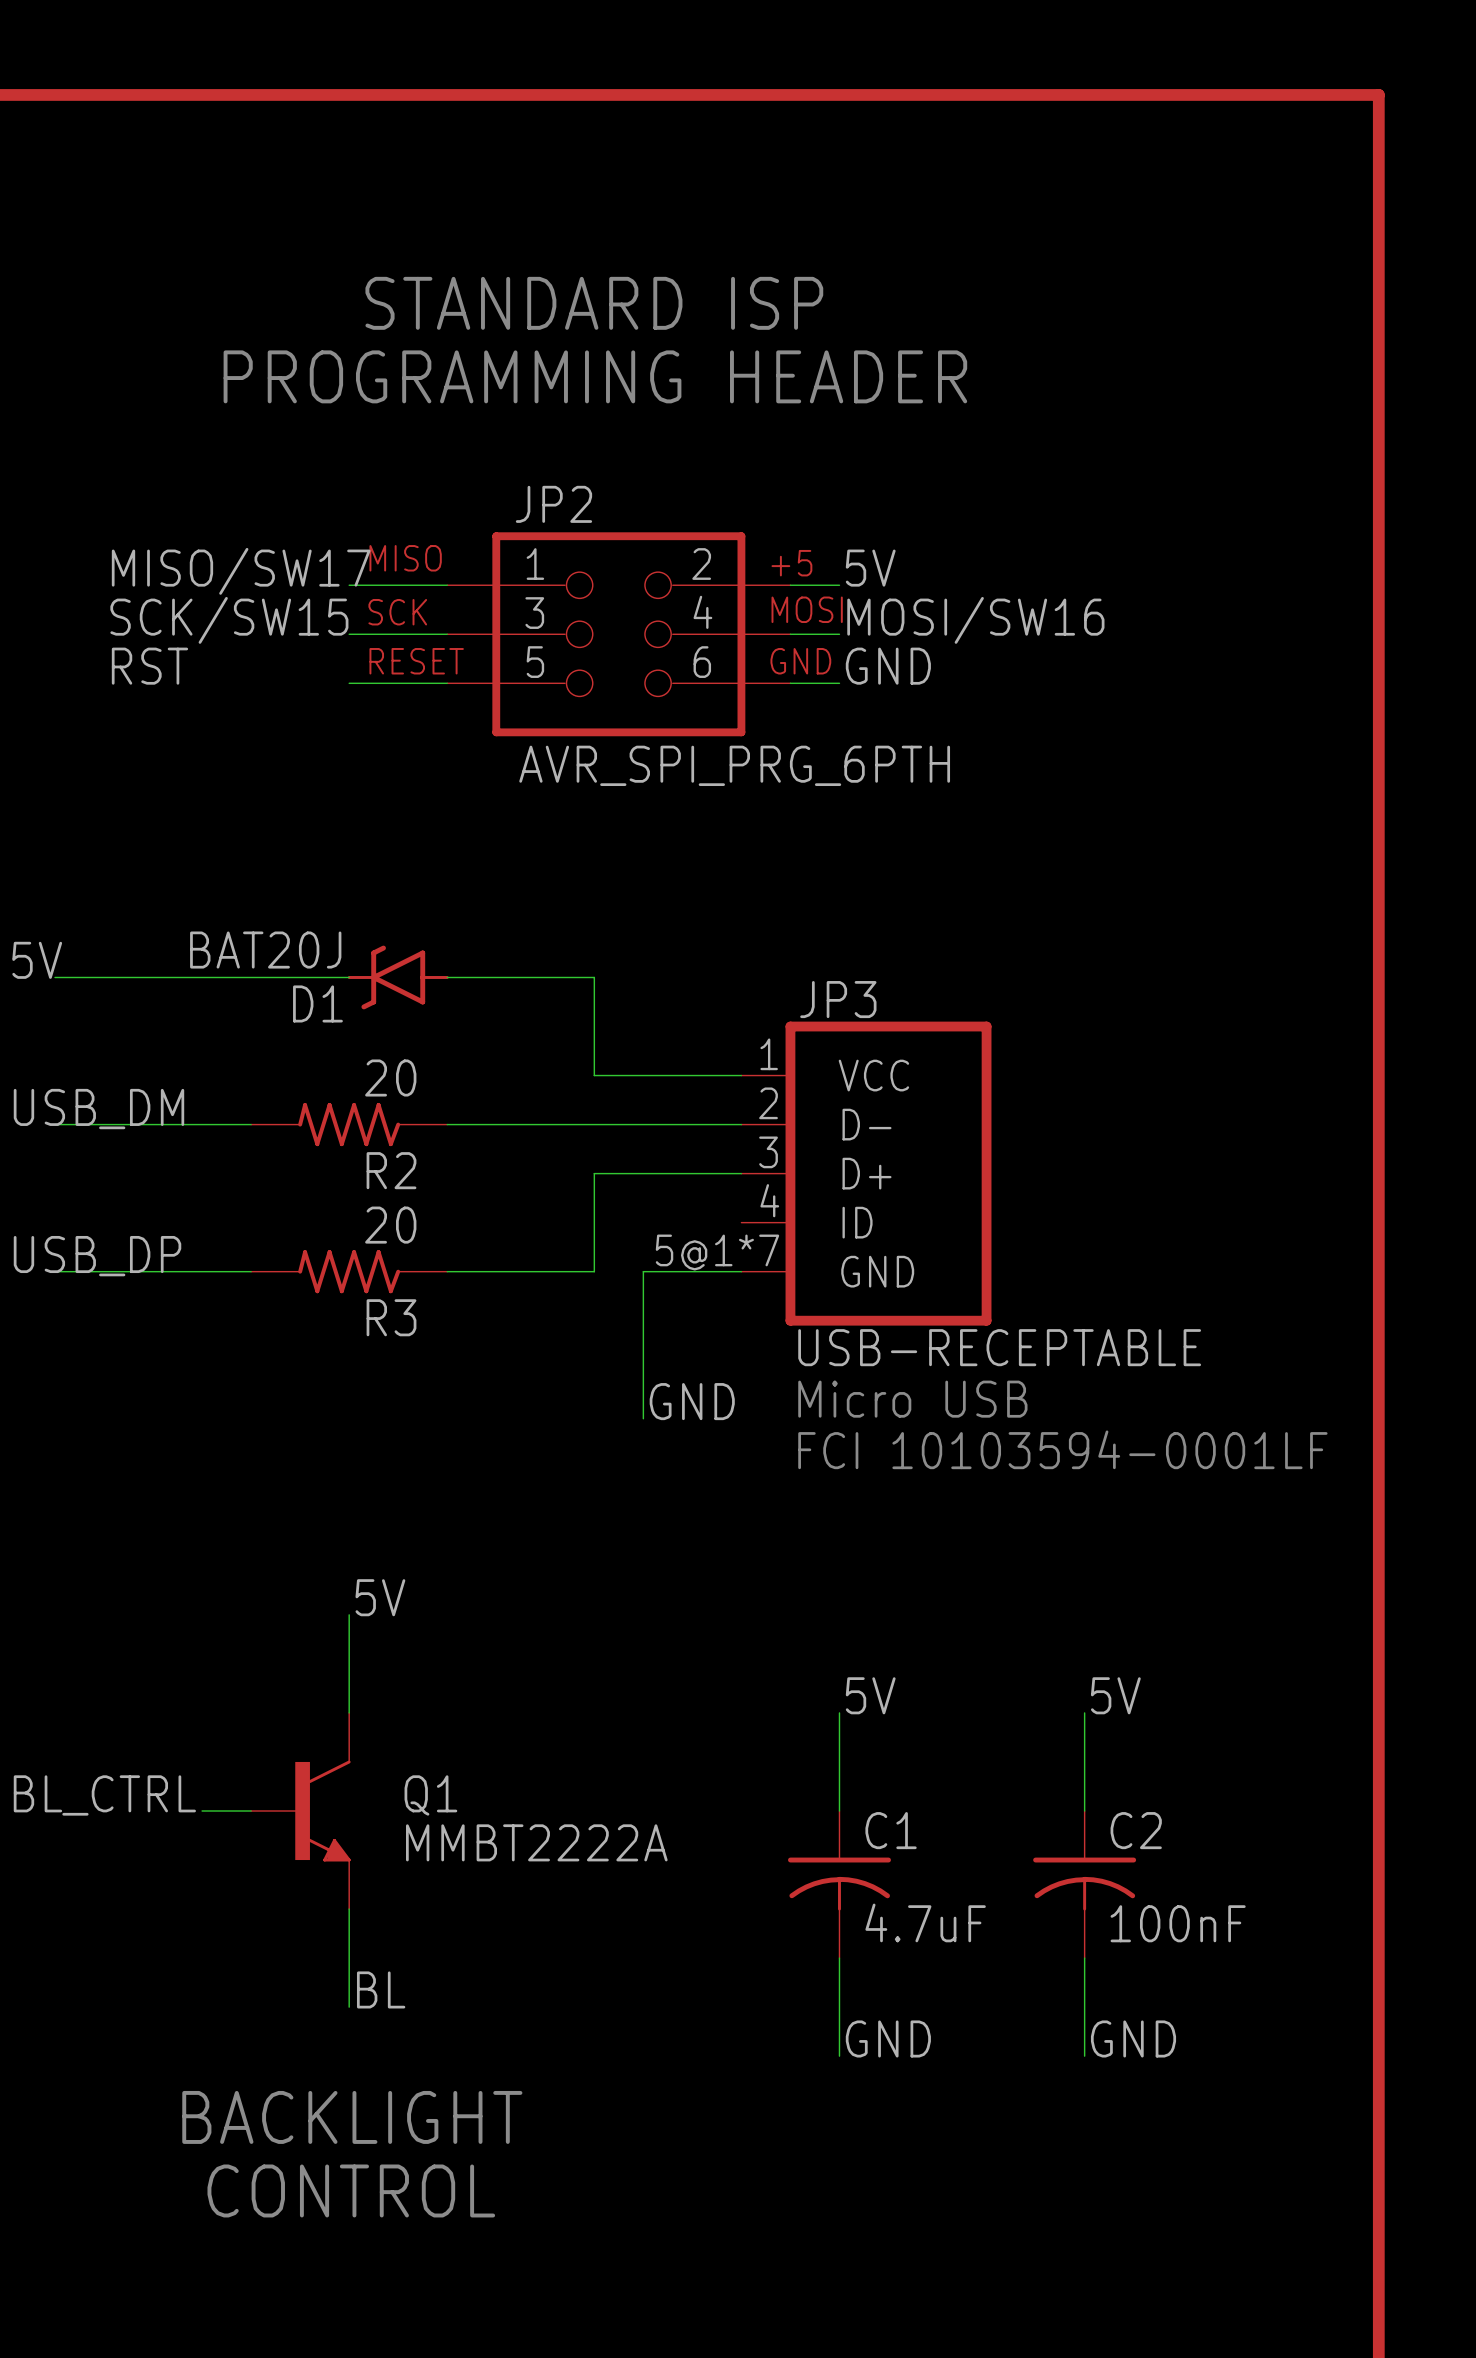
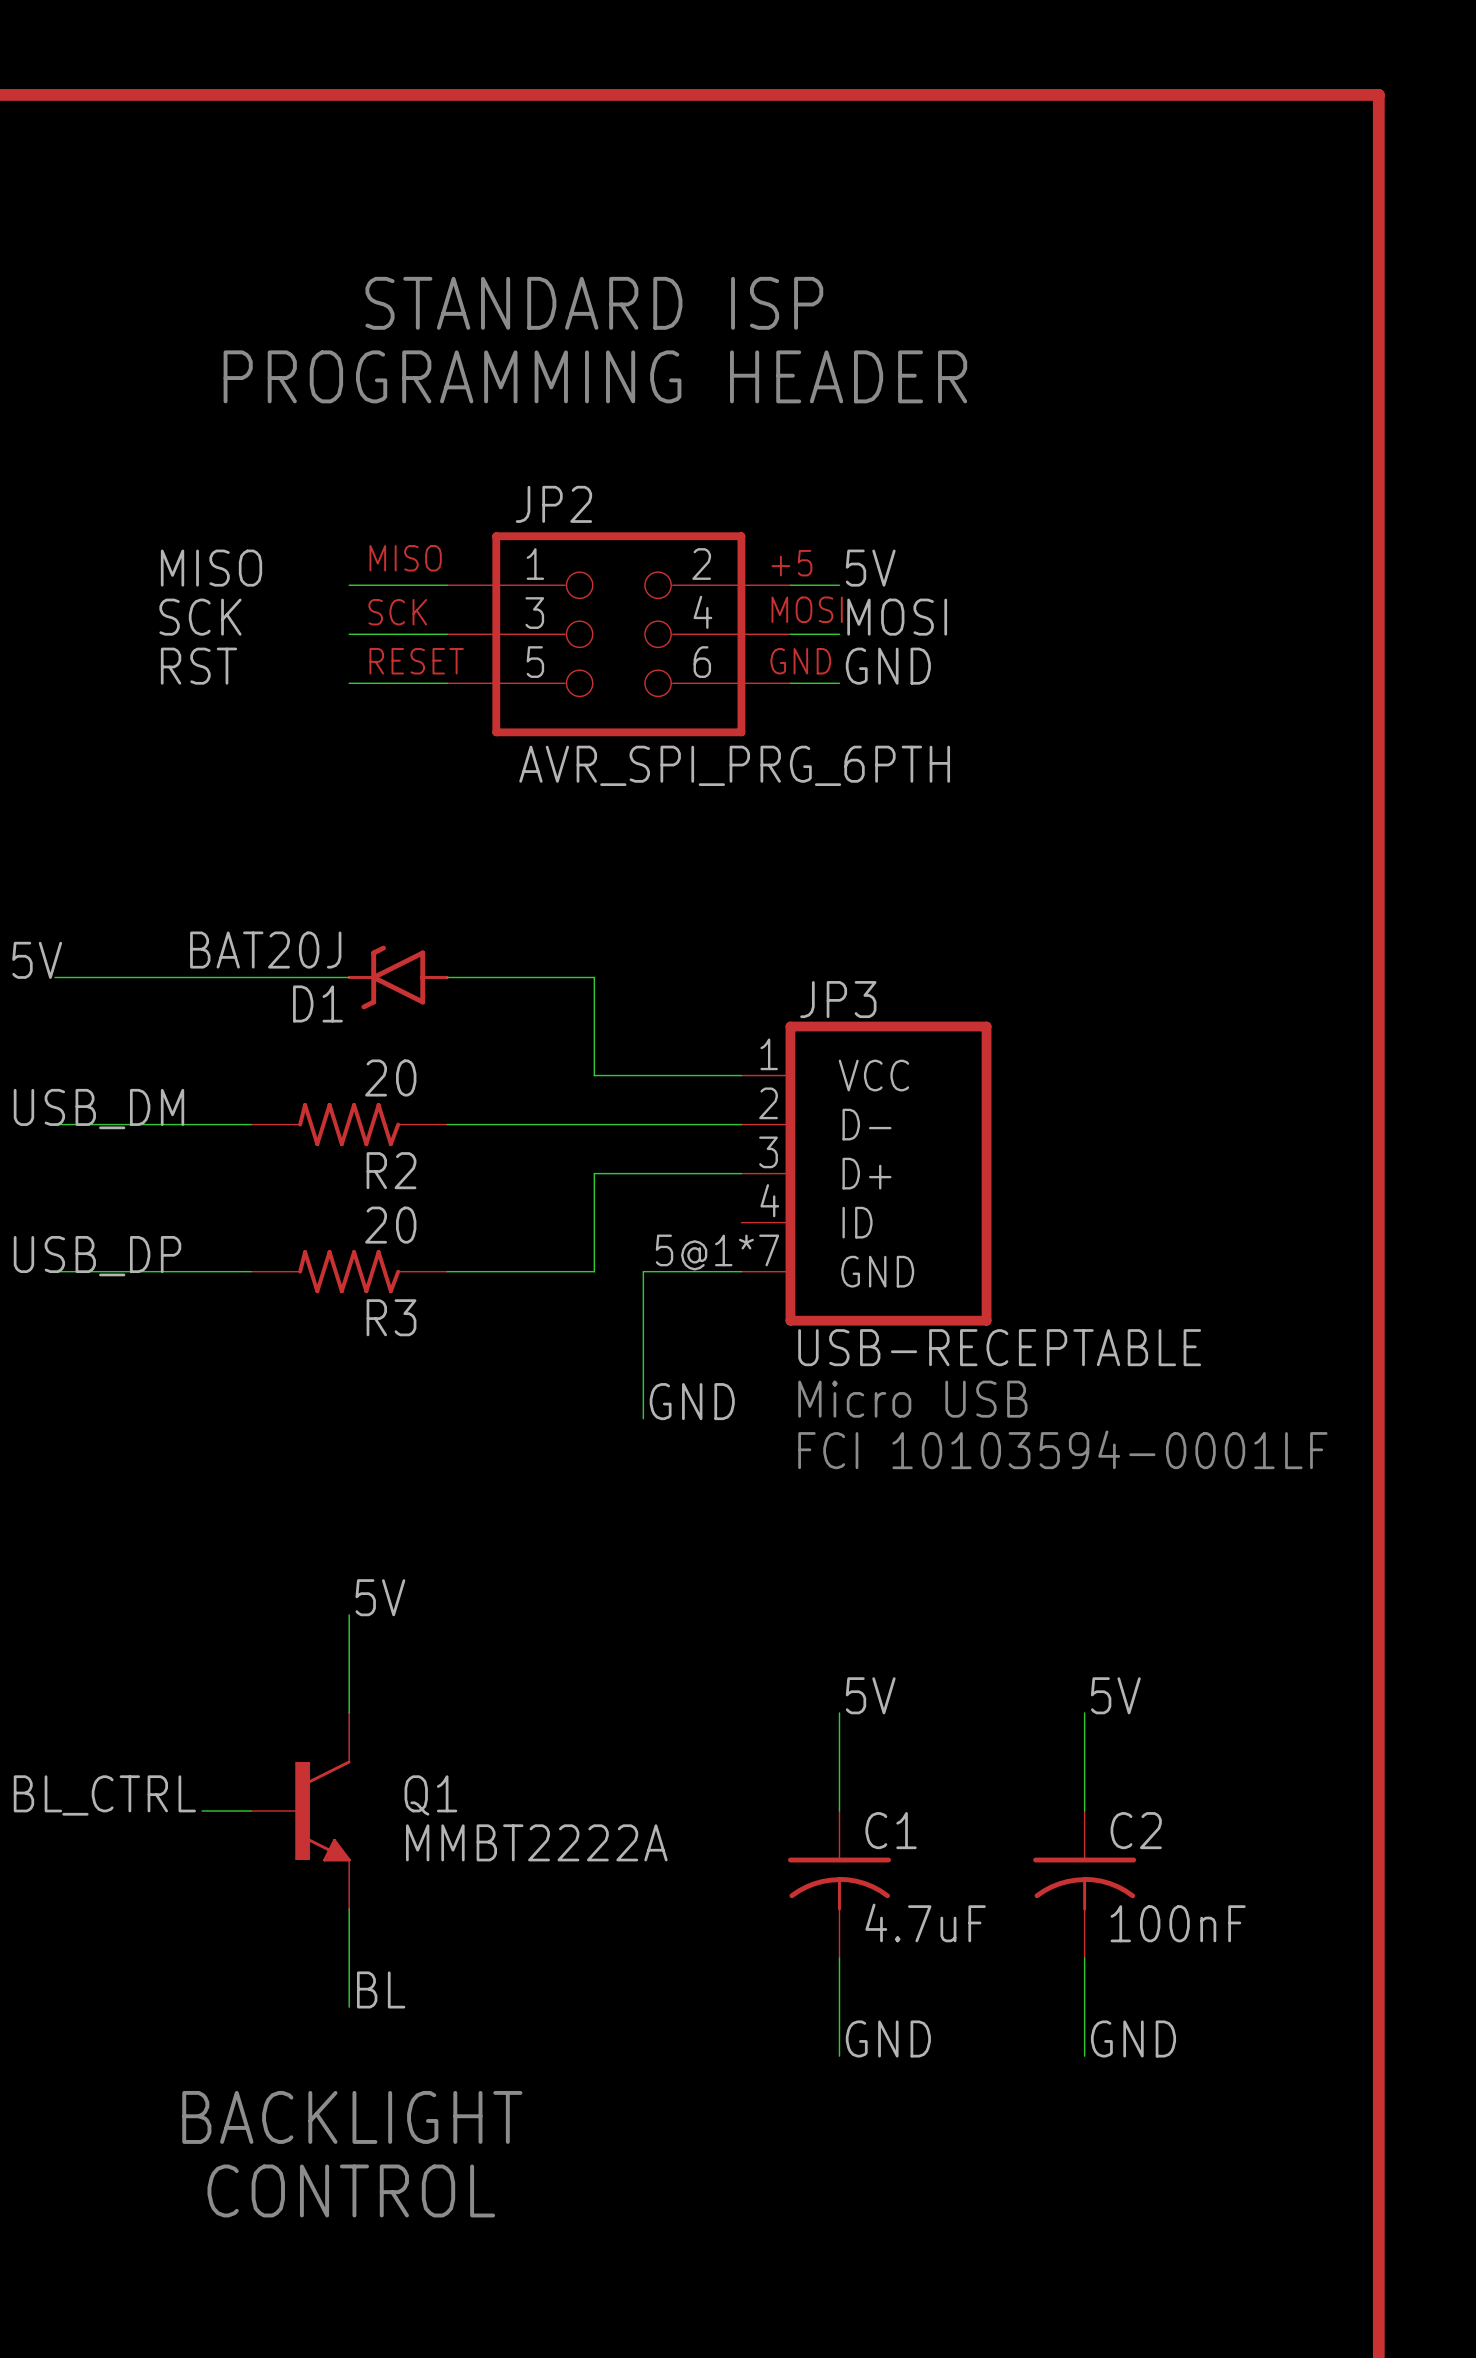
label: MISO/SW17 (241, 571) -> MISO (211, 568)
label: none -> SCK (200, 617)
label: SCK/SW15 (229, 620) -> none
label: MOSI/SW16 (975, 620) -> MOSI (897, 617)
label position: RST (149, 666) -> RST (199, 666)

